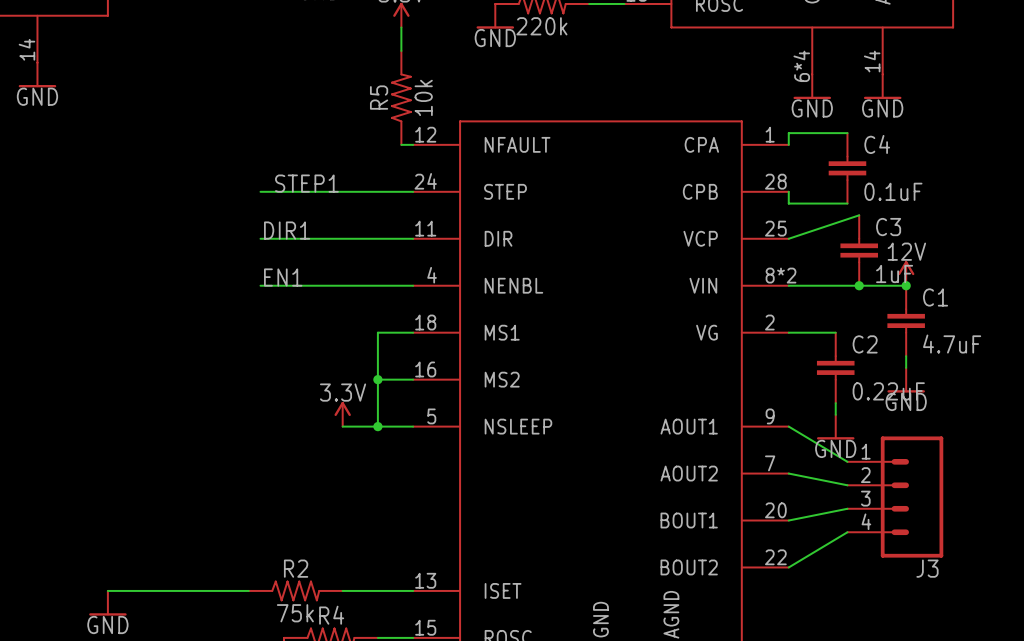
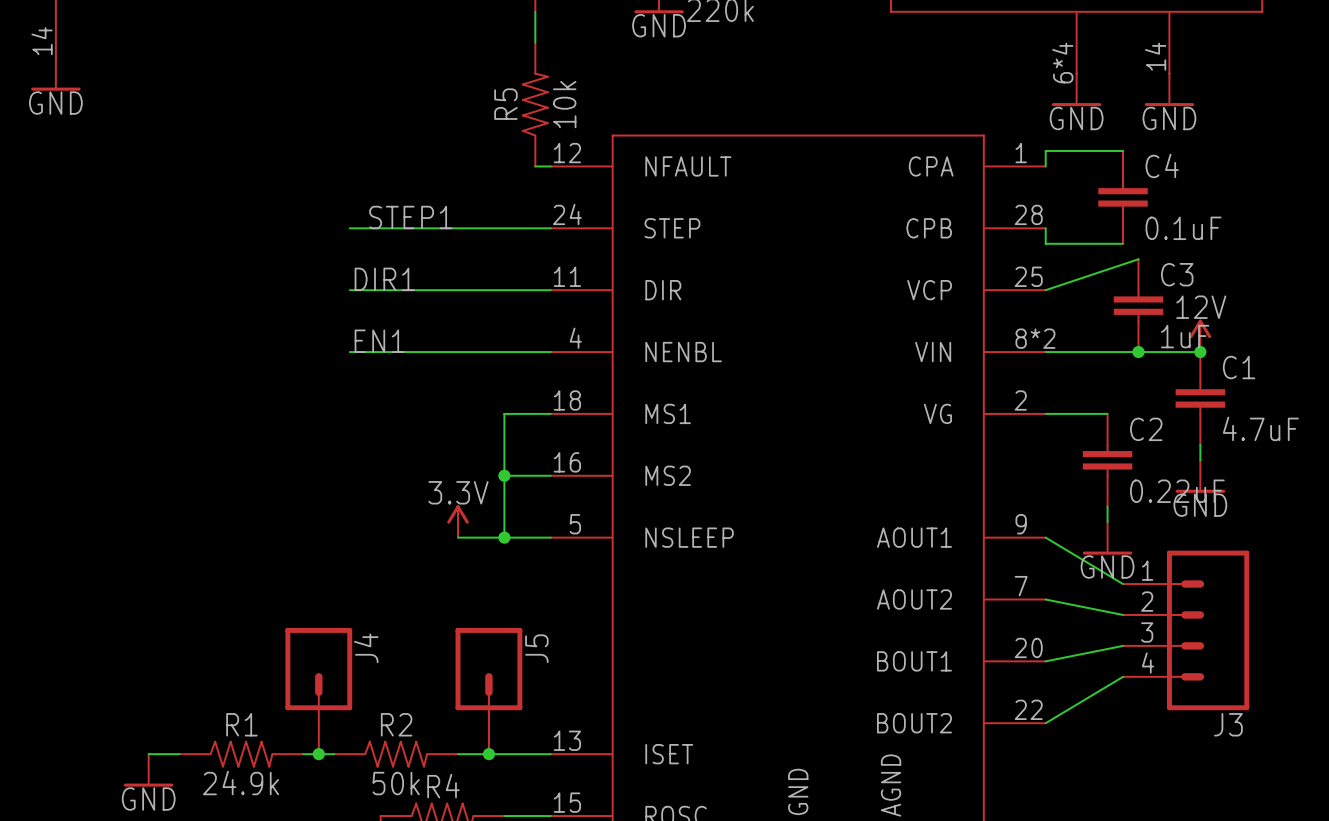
J4: none -> (318, 691)
J5: none -> (488, 691)
R1: none -> 24.9k (241, 754)
junction: none -> (318, 754)
junction: none -> (488, 754)
R2 value: 75k (295, 613) -> 50k (396, 783)

